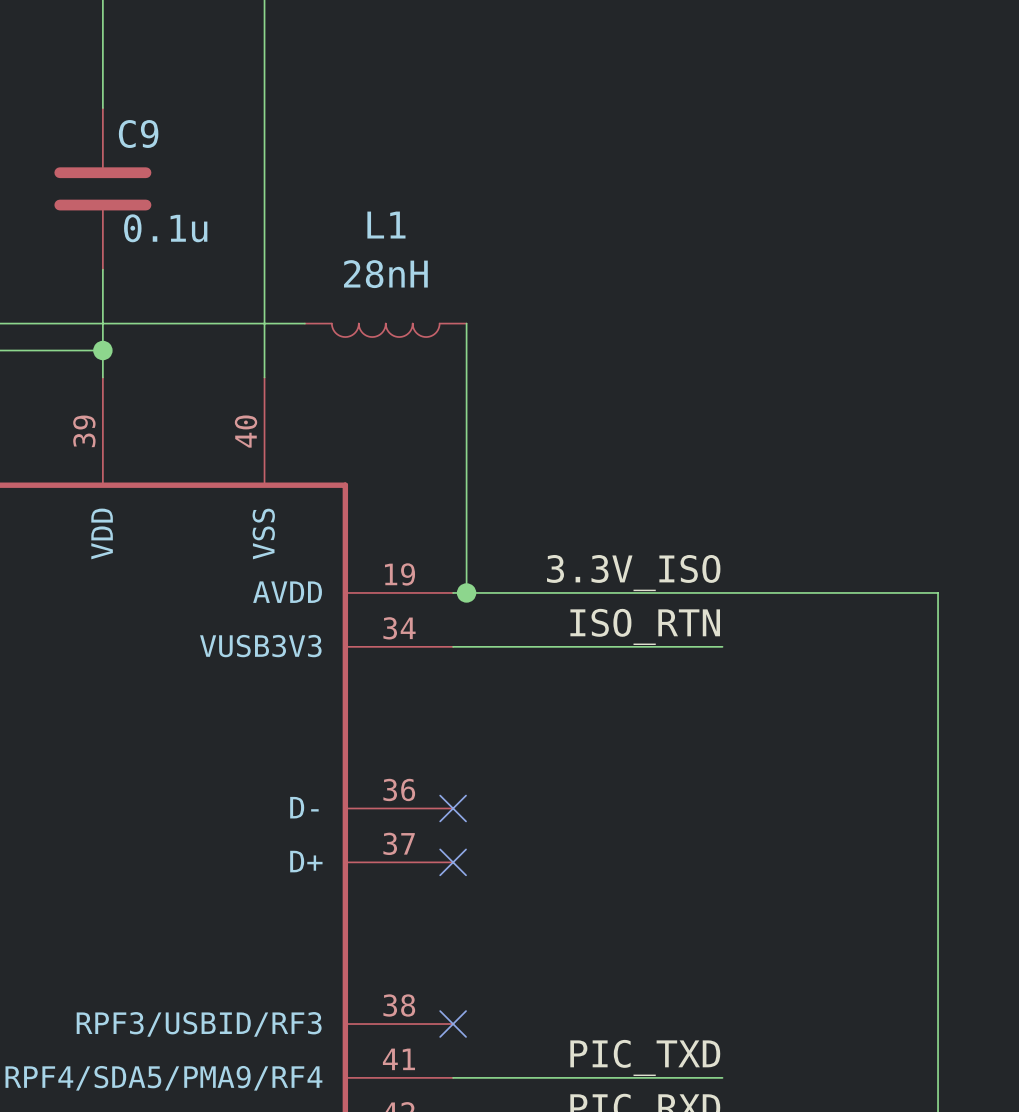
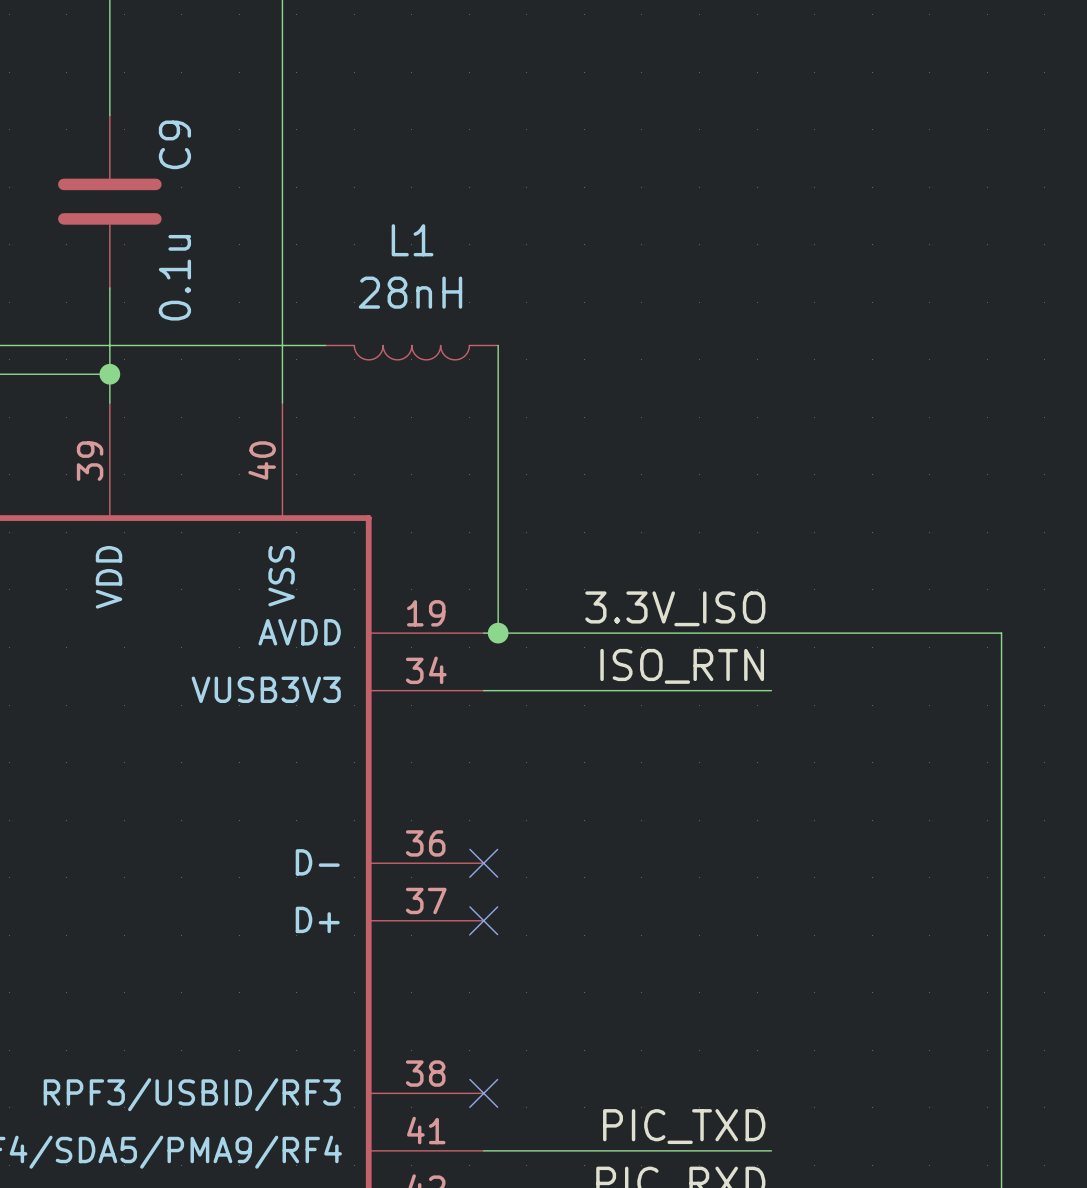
C9 name rotation: 0° (138, 134) -> 90° counterclockwise (174, 144)
C9 value rotation: 0° (165, 228) -> 90° counterclockwise (174, 277)

